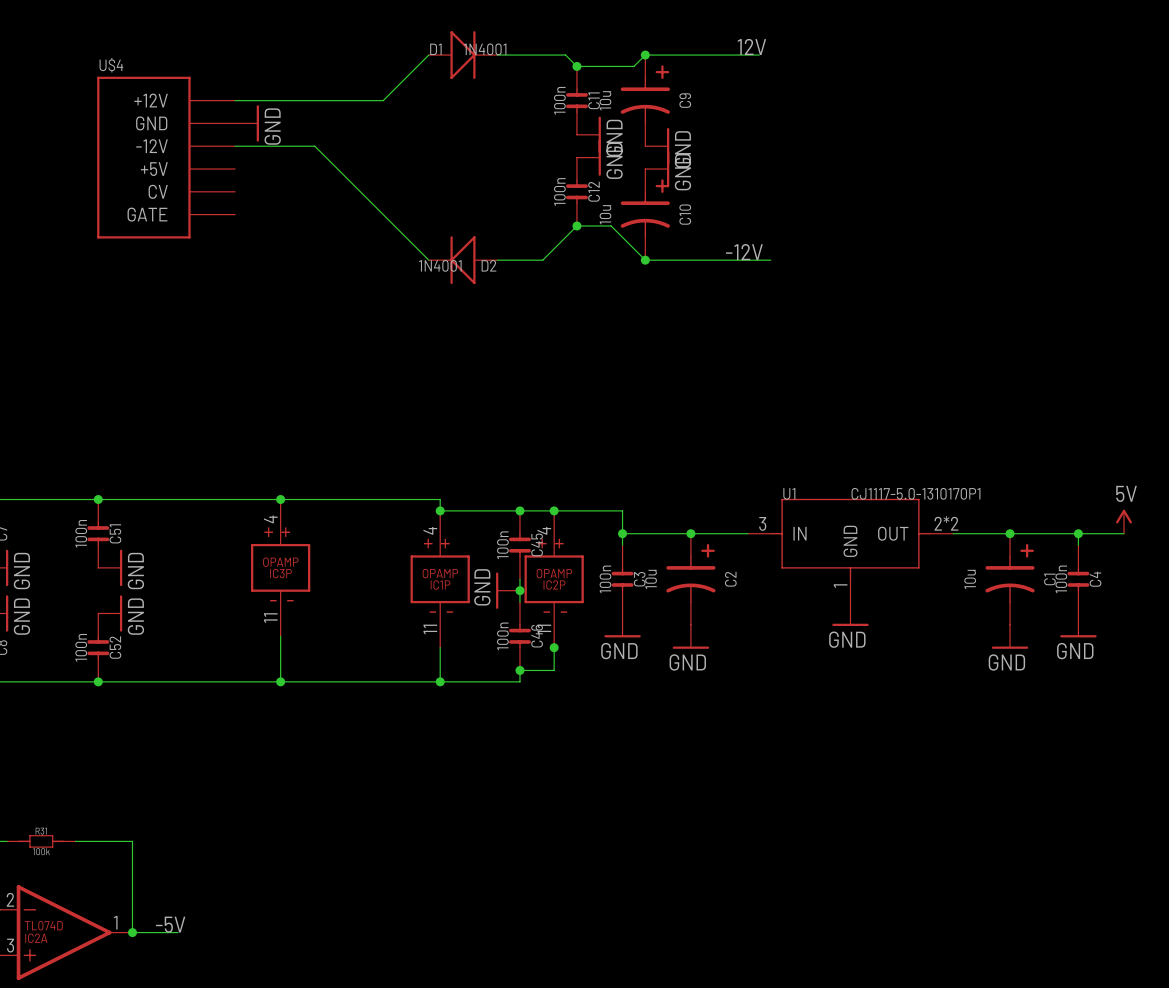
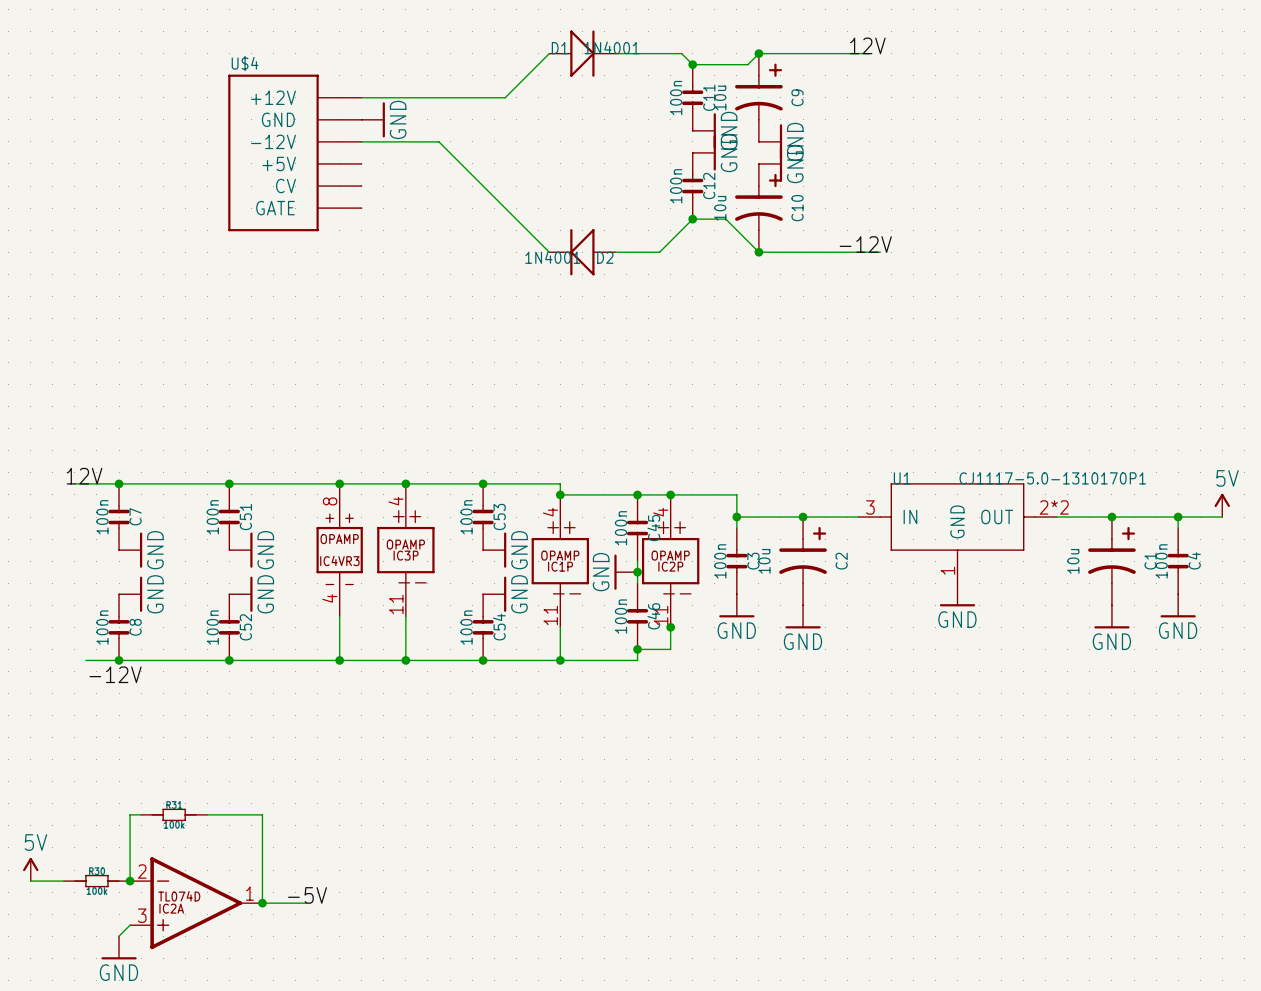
junction: none -> (339, 483)
junction: none -> (483, 483)
C53: none -> 100n (483, 517)
IC4VR3: none -> (339, 550)
power symbol: none -> GND (494, 550)
power symbol: none -> GND (494, 594)
wire: none -> (339, 616) (339, 660)
C54: none -> 100n (483, 627)
junction: none -> (339, 660)
junction: none -> (483, 660)

